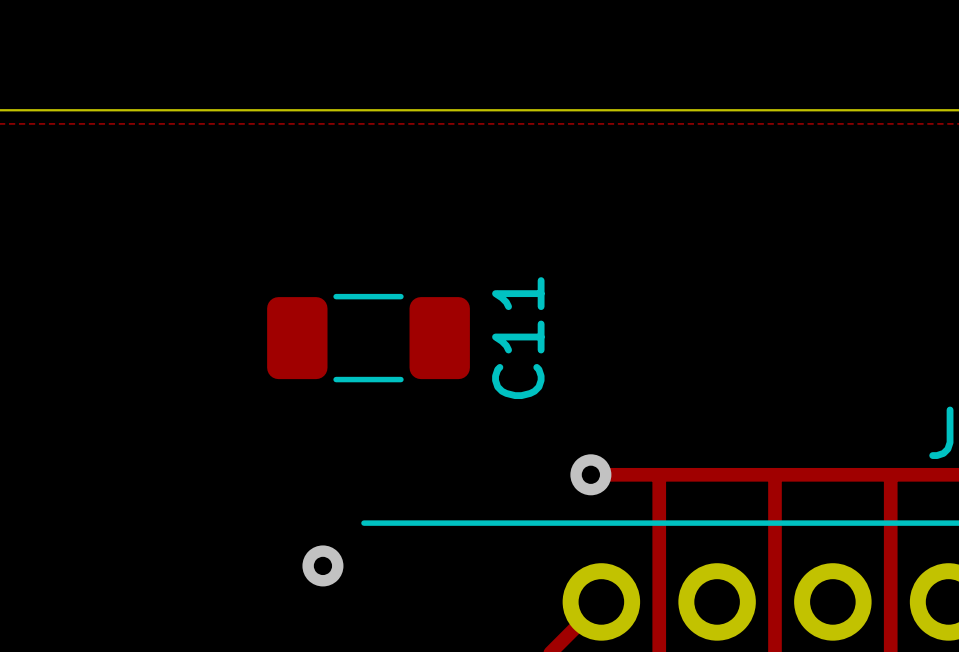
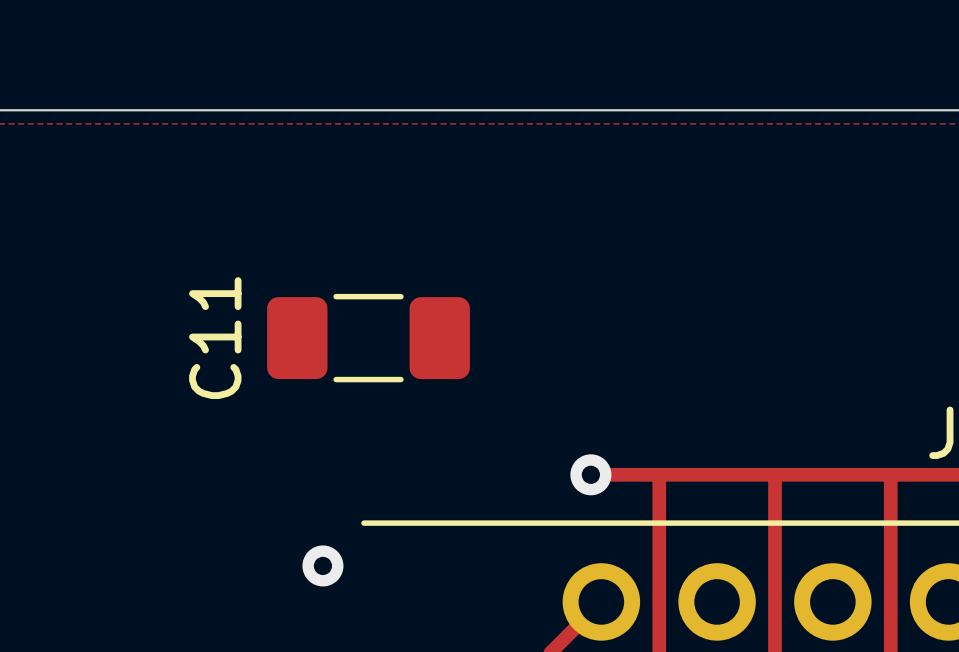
C11 name position: C11 (518, 338) -> C11 (215, 338)

